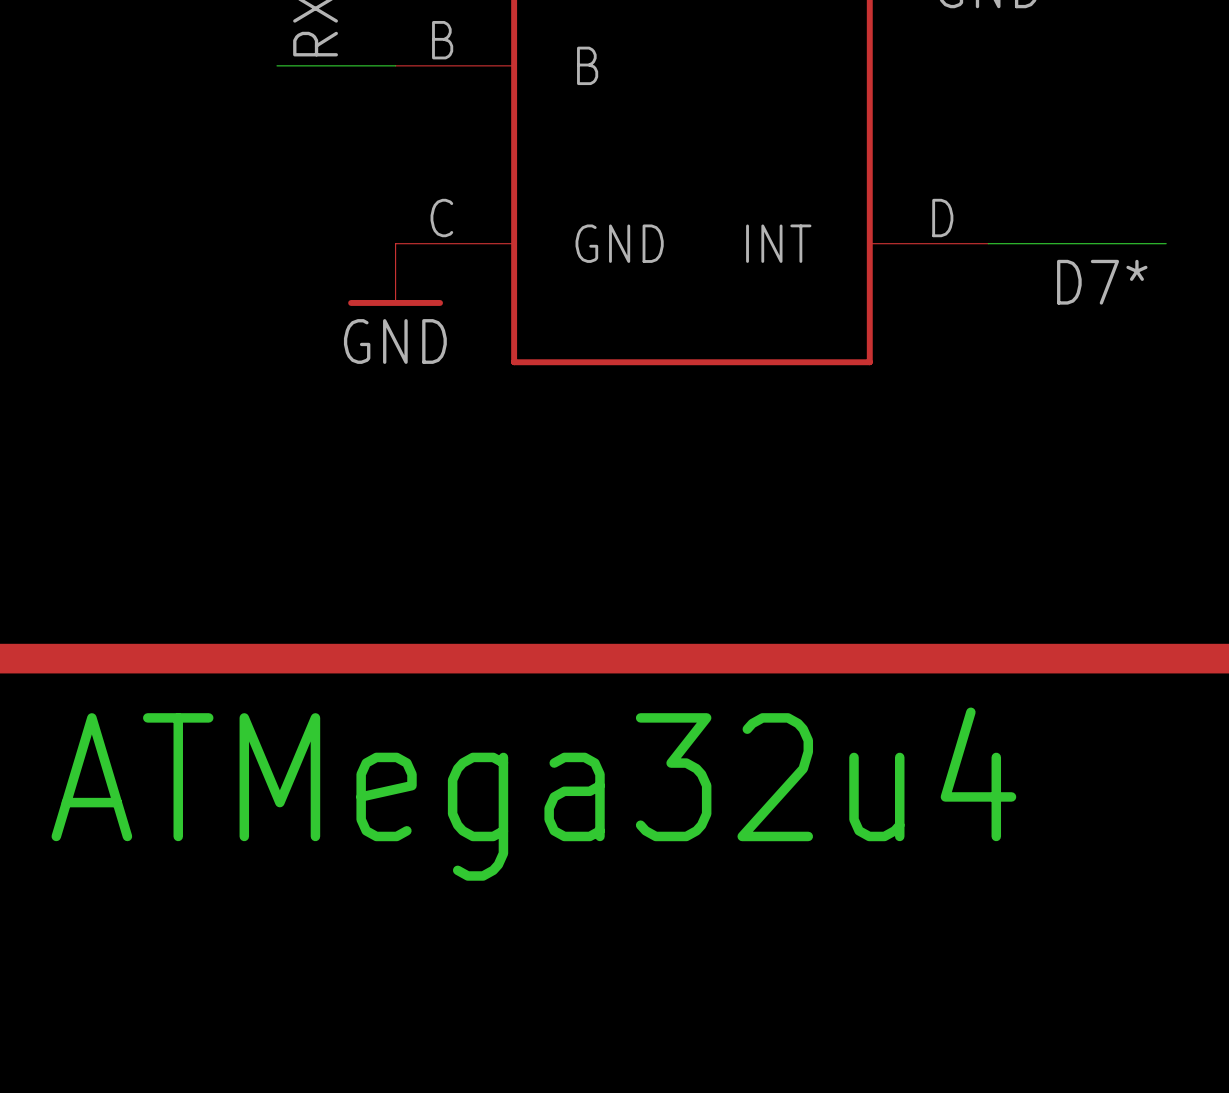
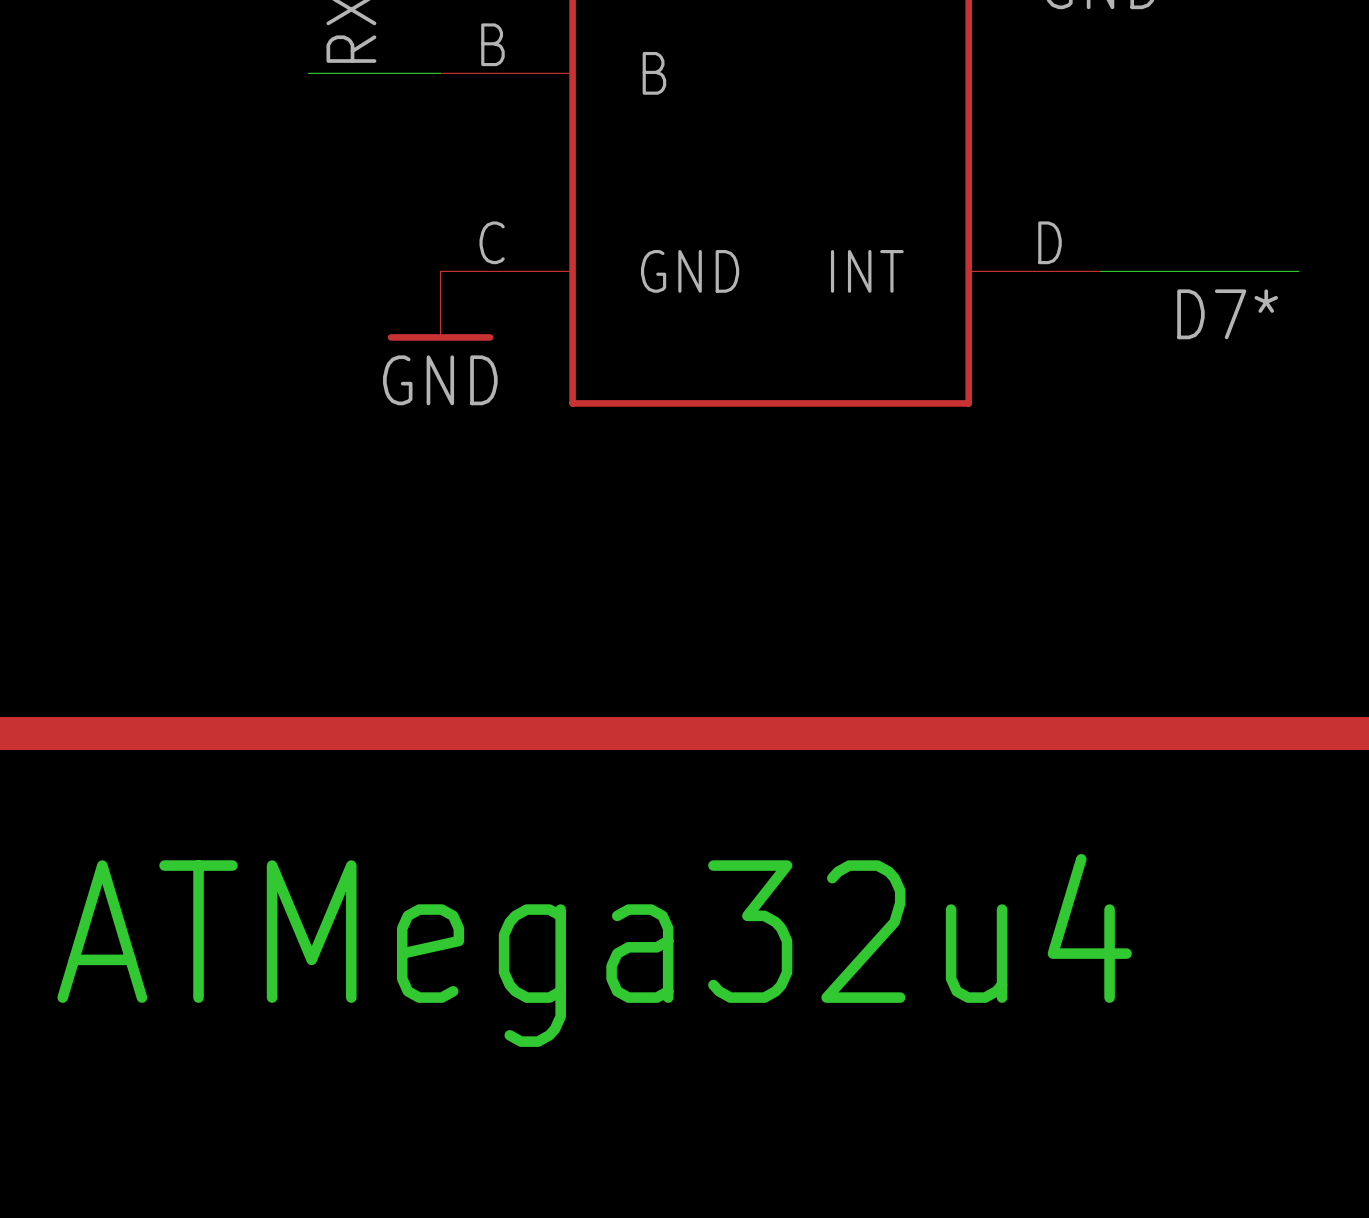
text position: ATMega32u4 (533, 794) -> ATMega32u4 (594, 950)

